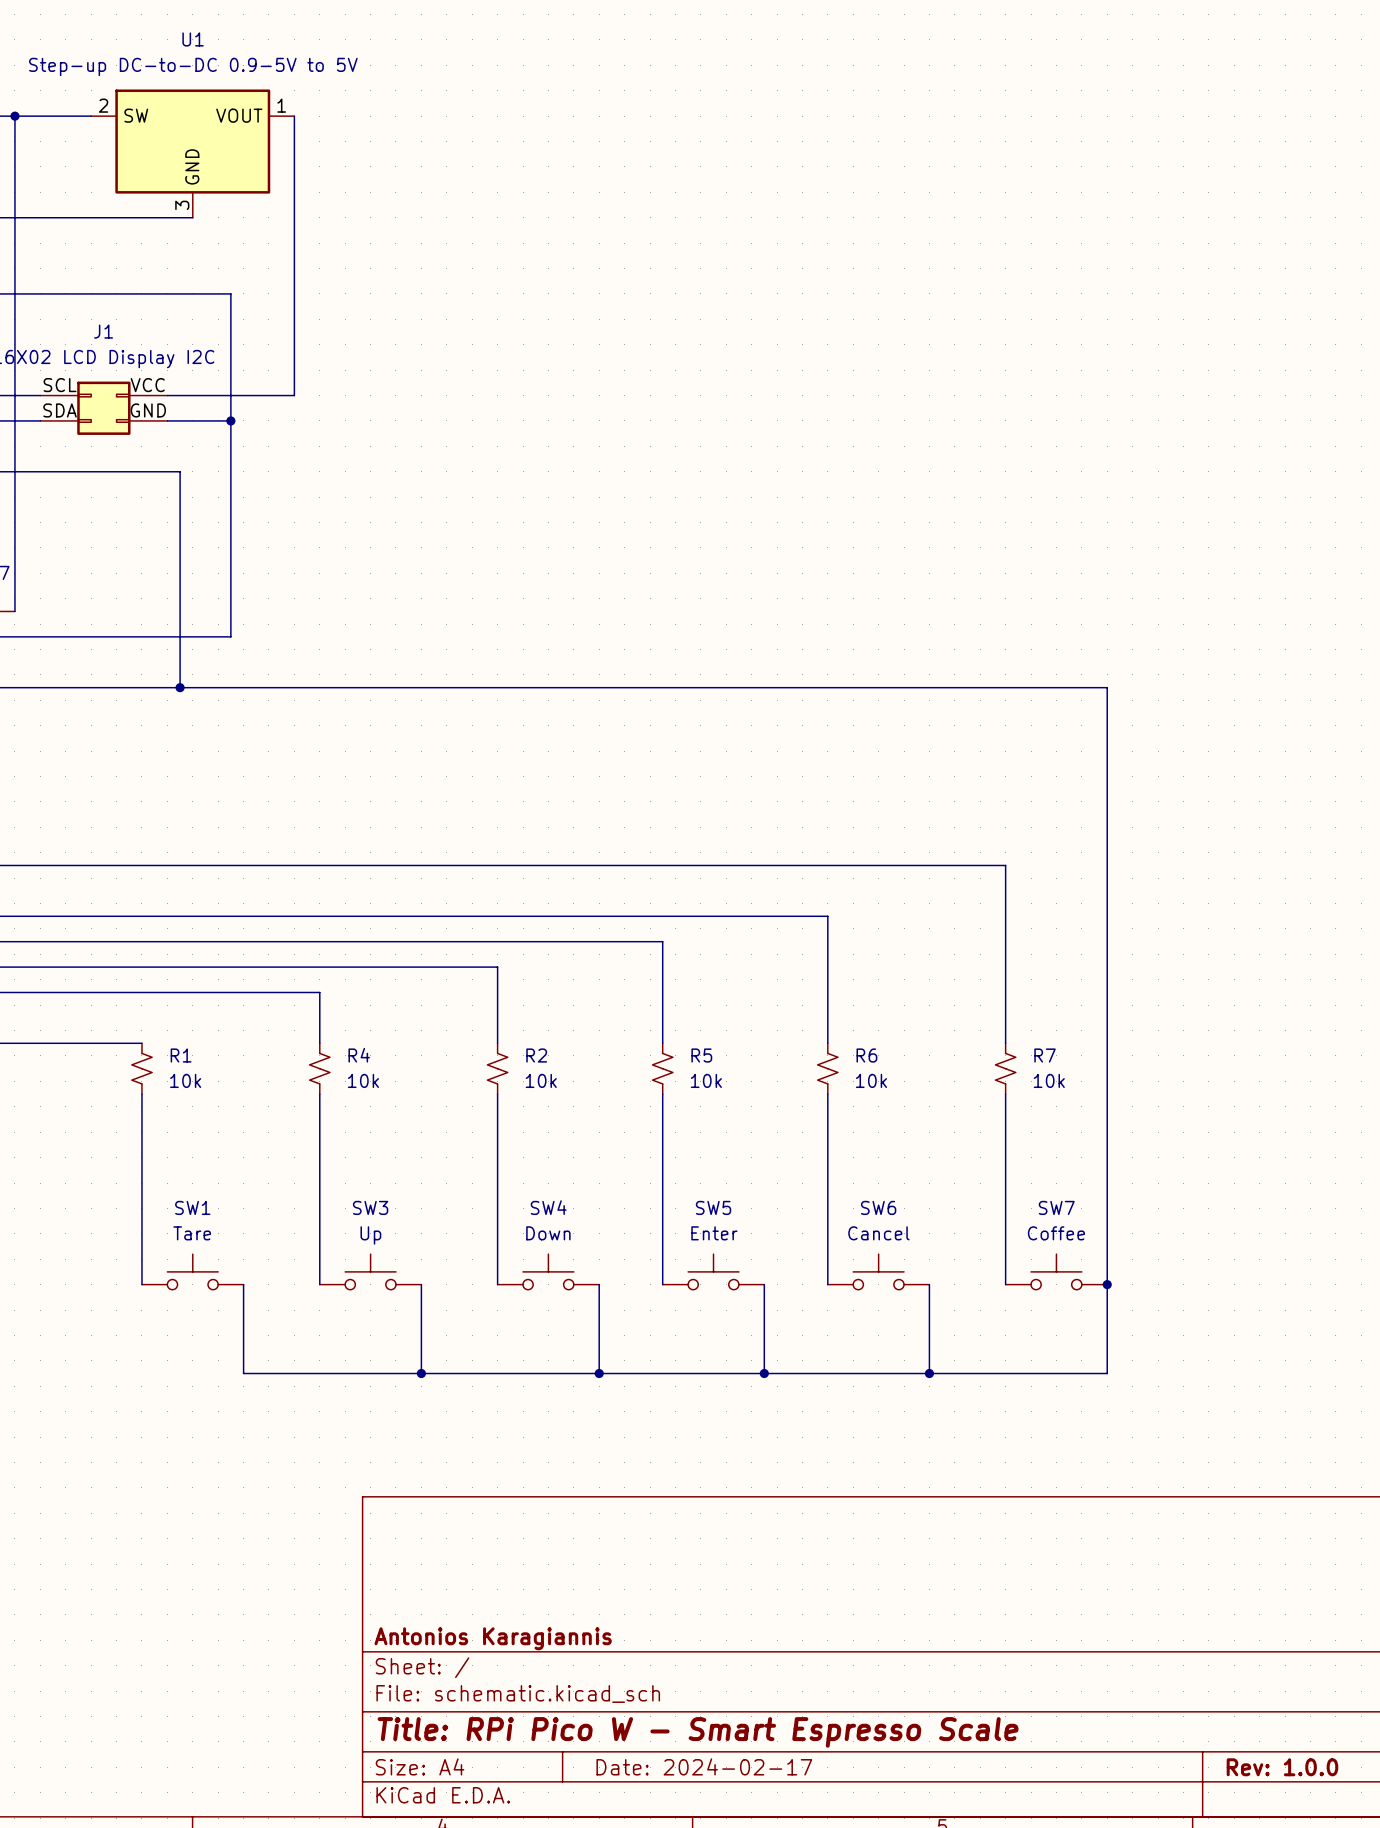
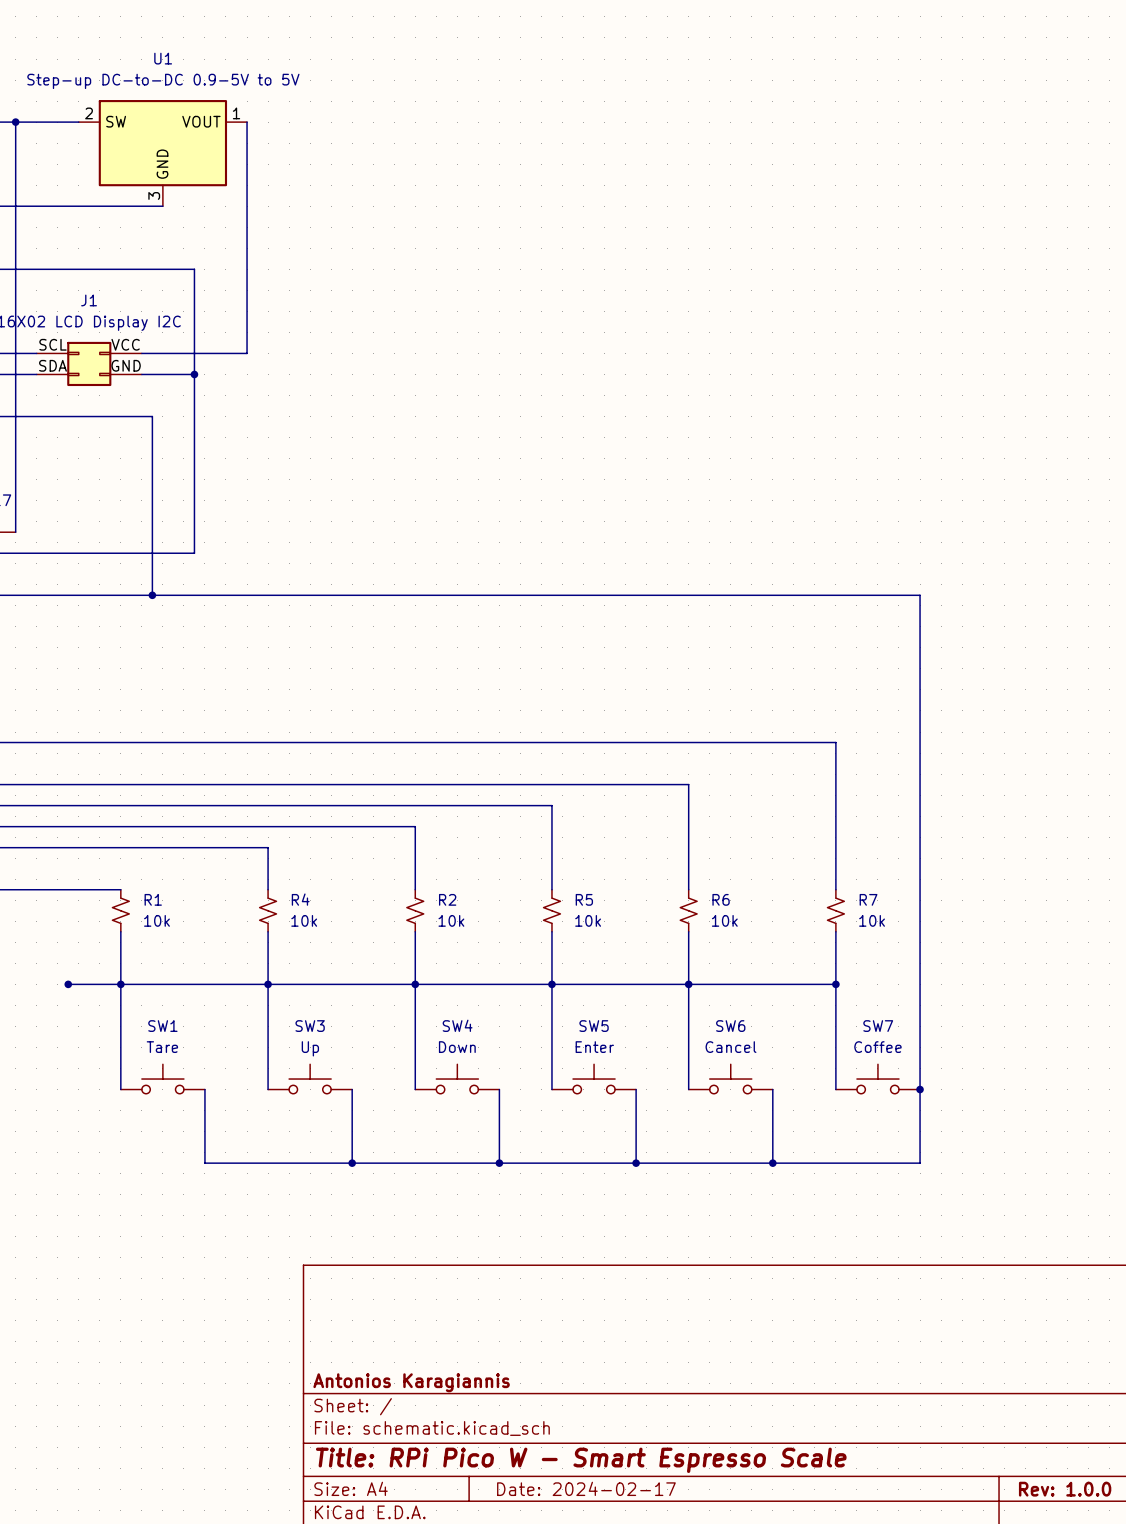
wire: none -> (68, 984) (835, 984)
junction: none -> (68, 984)
junction: none -> (120, 984)
junction: none -> (268, 984)
junction: none -> (415, 984)
junction: none -> (551, 984)
junction: none -> (688, 984)
junction: none -> (835, 984)

